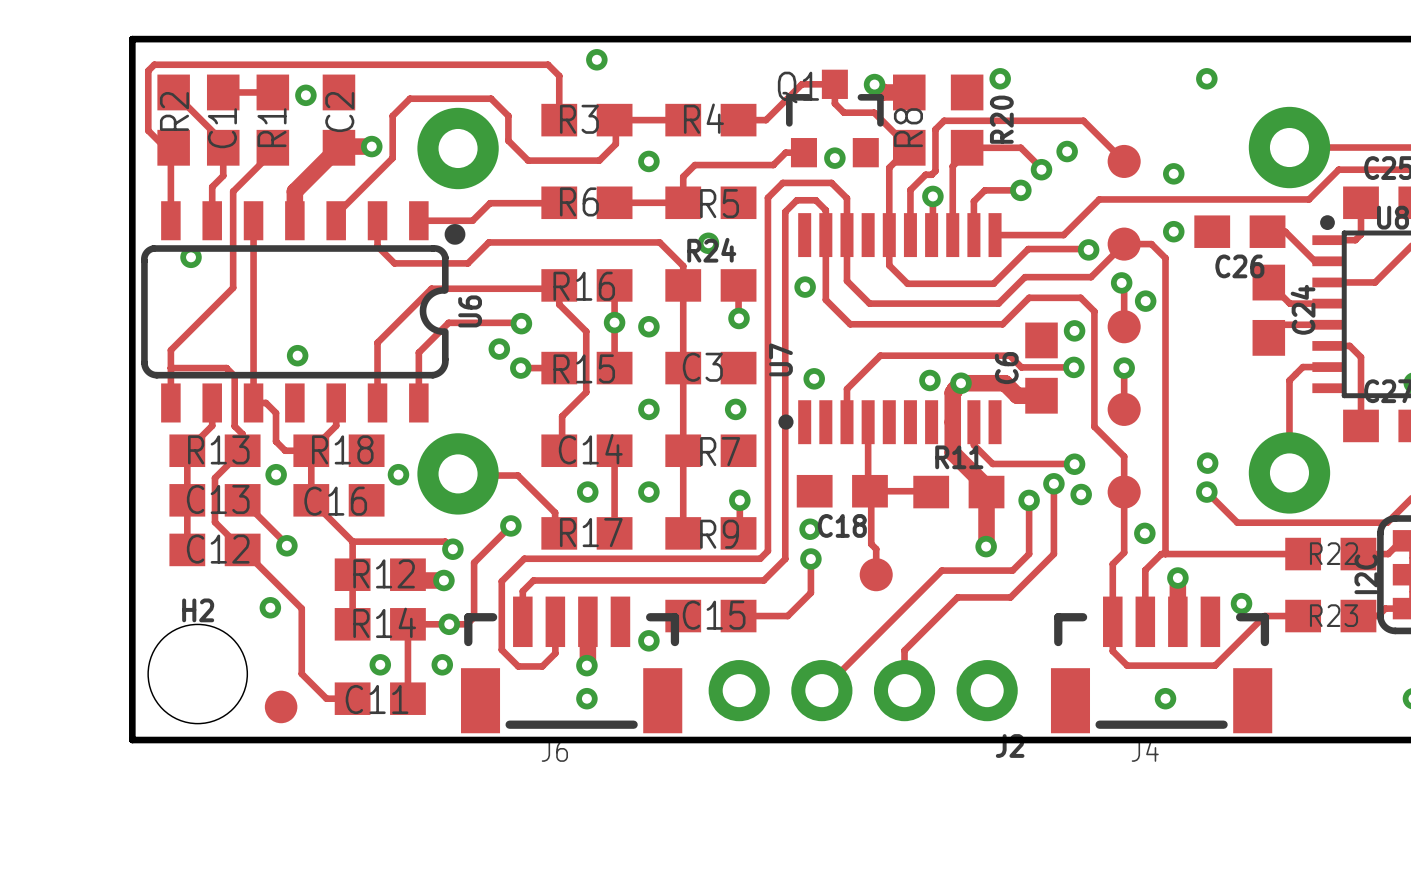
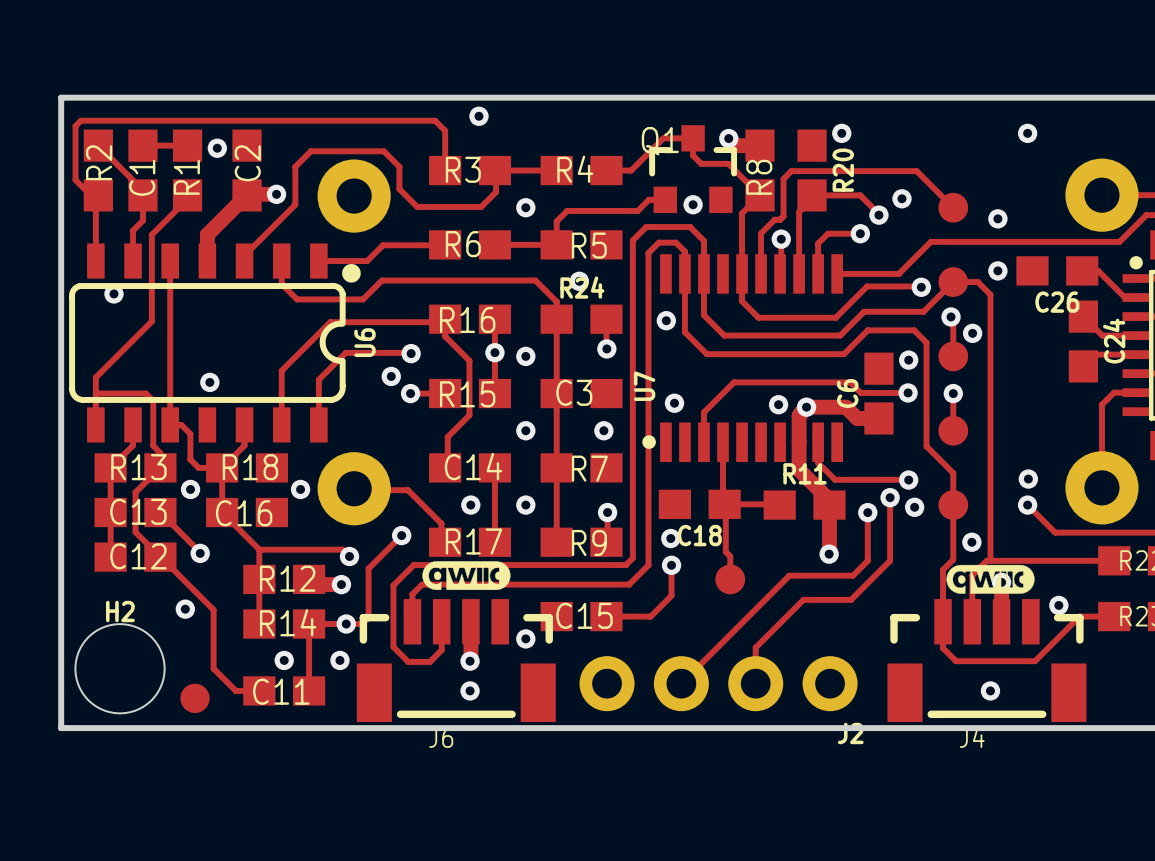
drawing: none -> [422, 561, 511, 591]
drawing: none -> [946, 564, 1035, 594]

